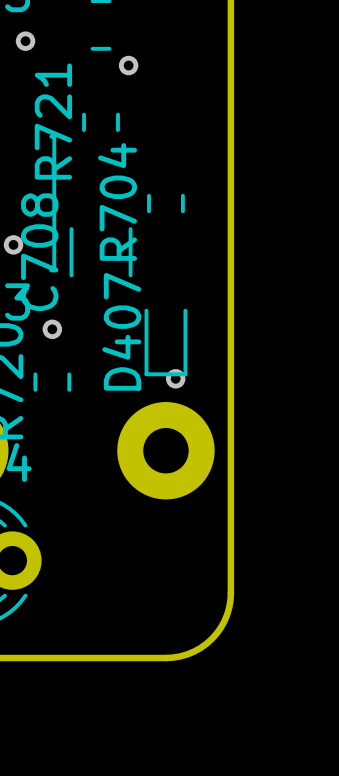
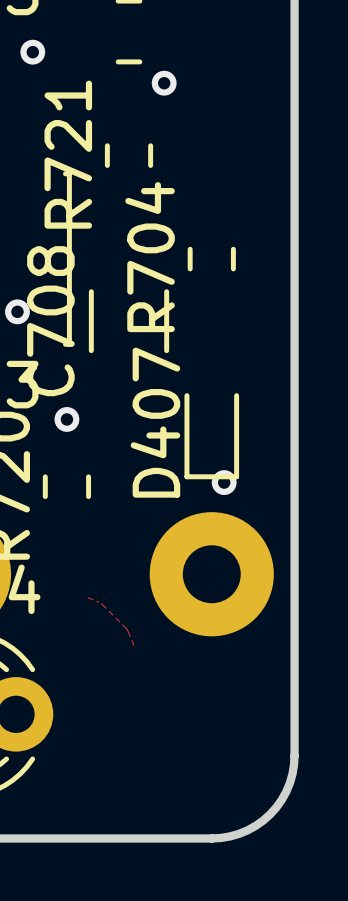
zone outline: none -> (87, 597) (98, 602)
zone outline: none -> (101, 603) (126, 629)
zone outline: none -> (127, 629) (127, 630)
zone outline: none -> (128, 631) (132, 642)

